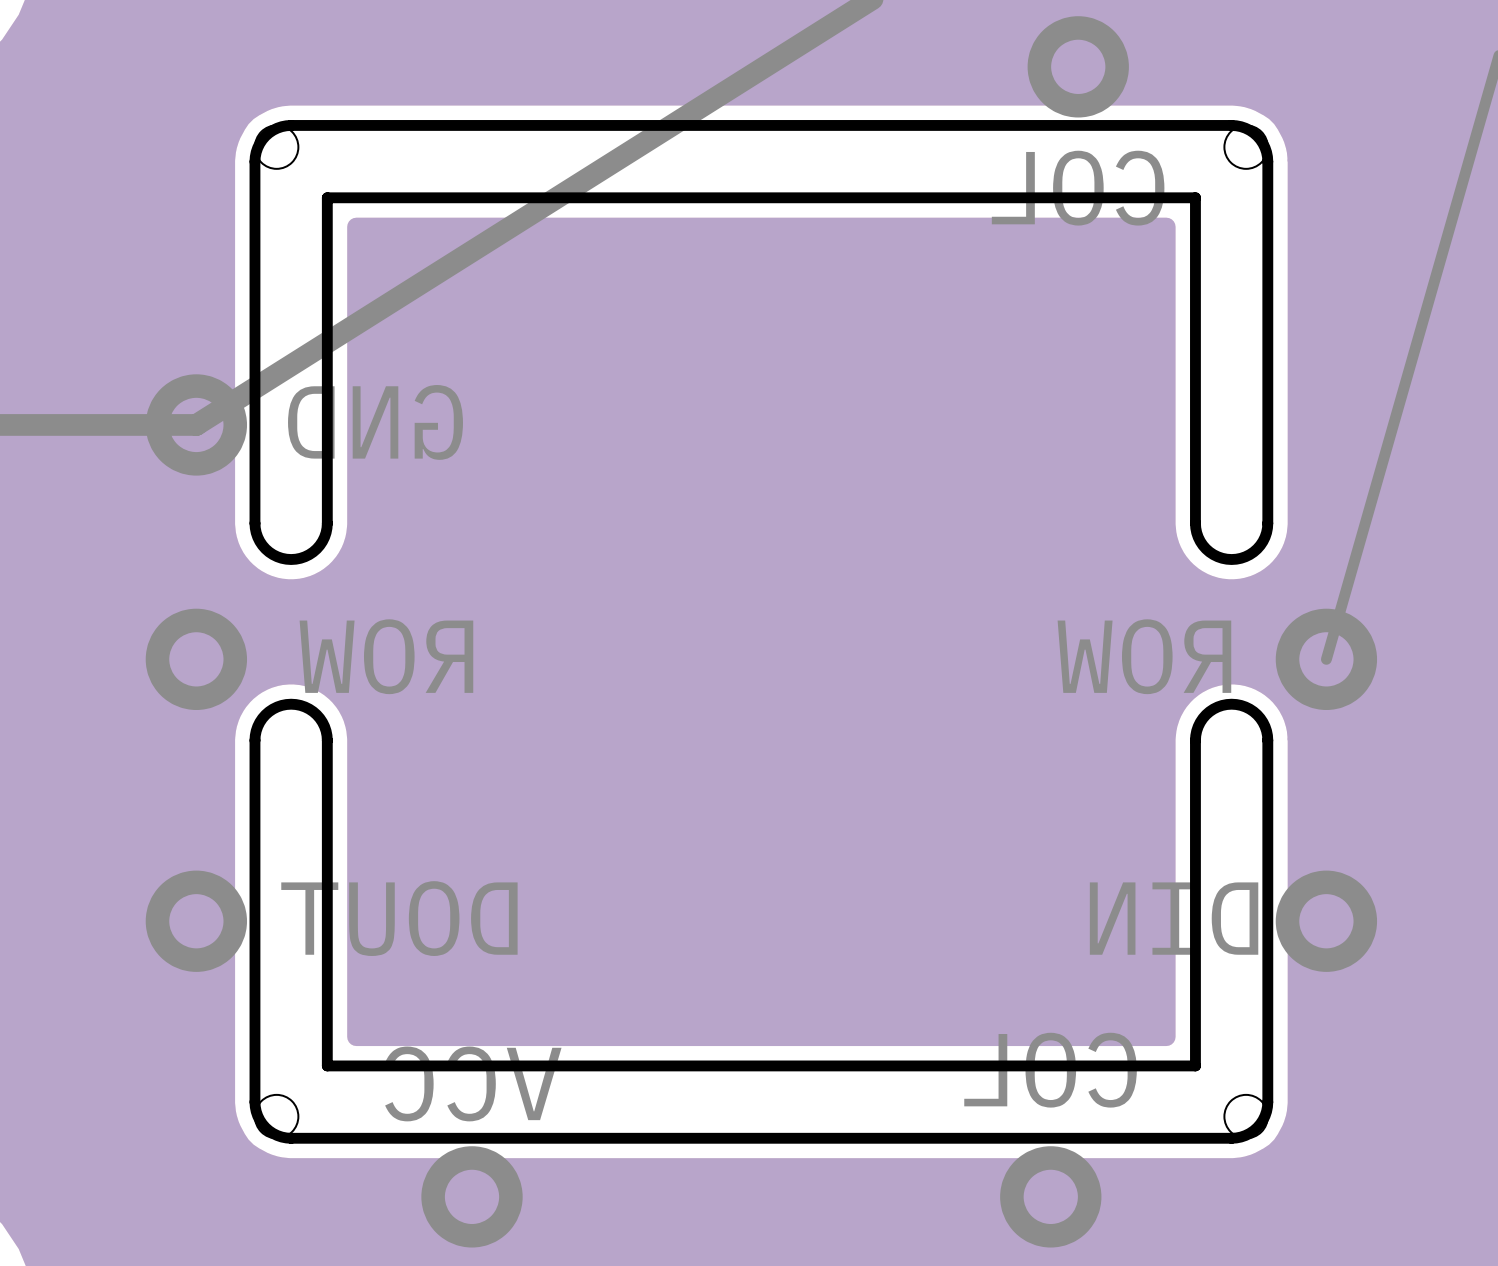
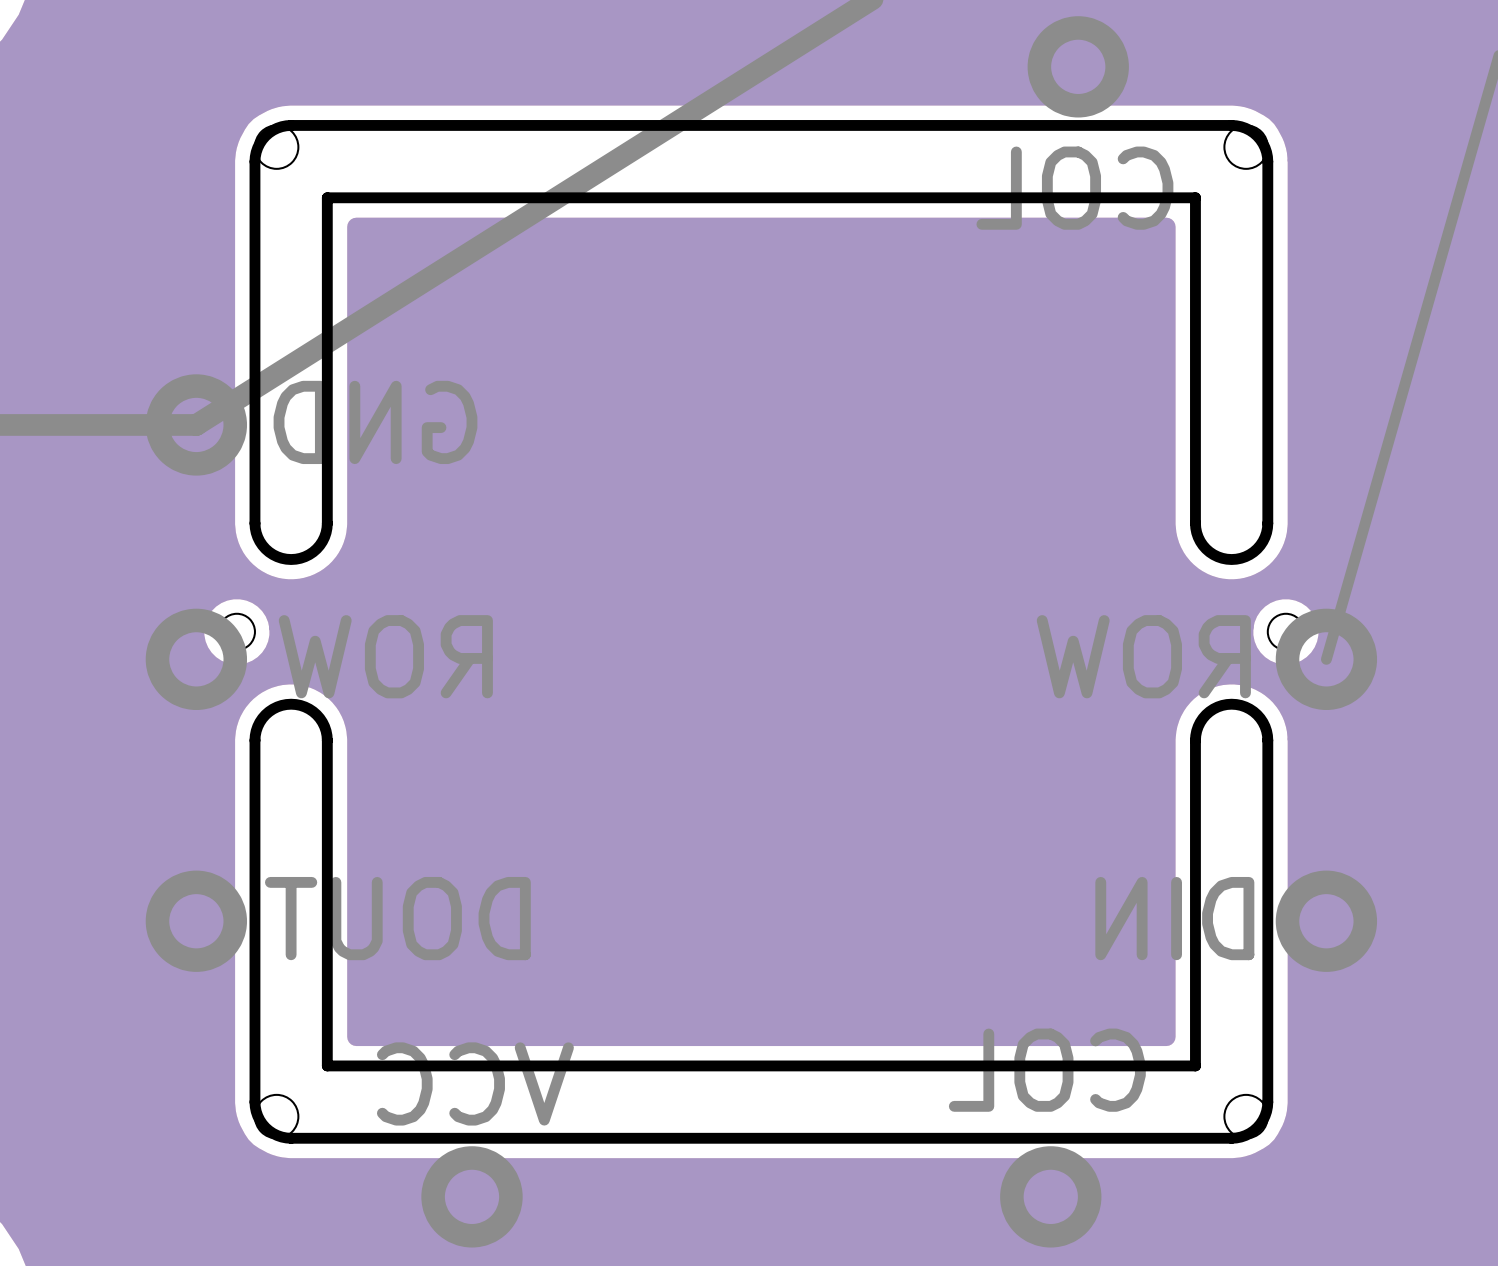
part footprint: [145, 16, 1378, 1248] -> [145, 16, 1378, 1248]

